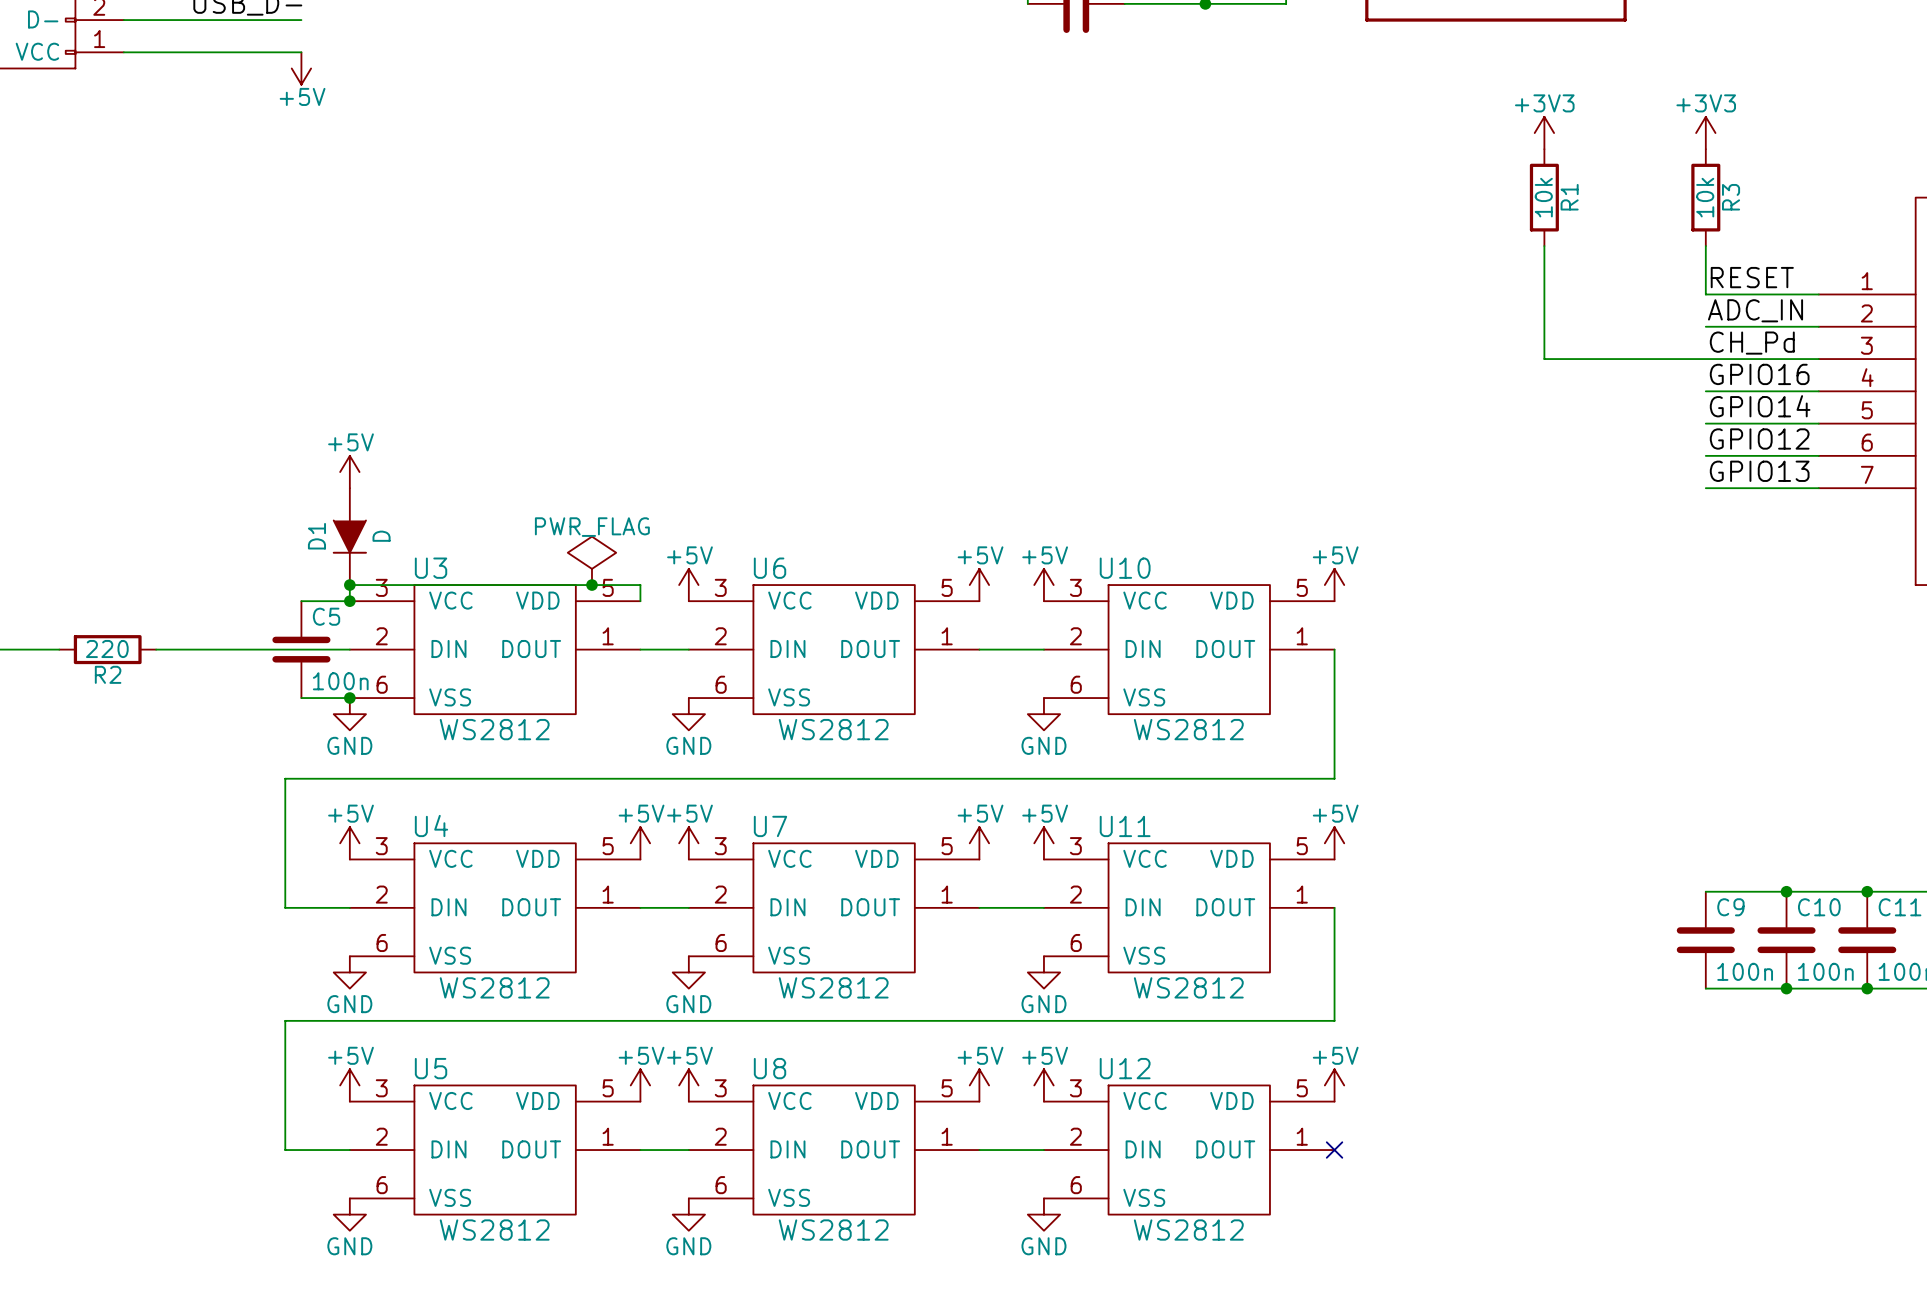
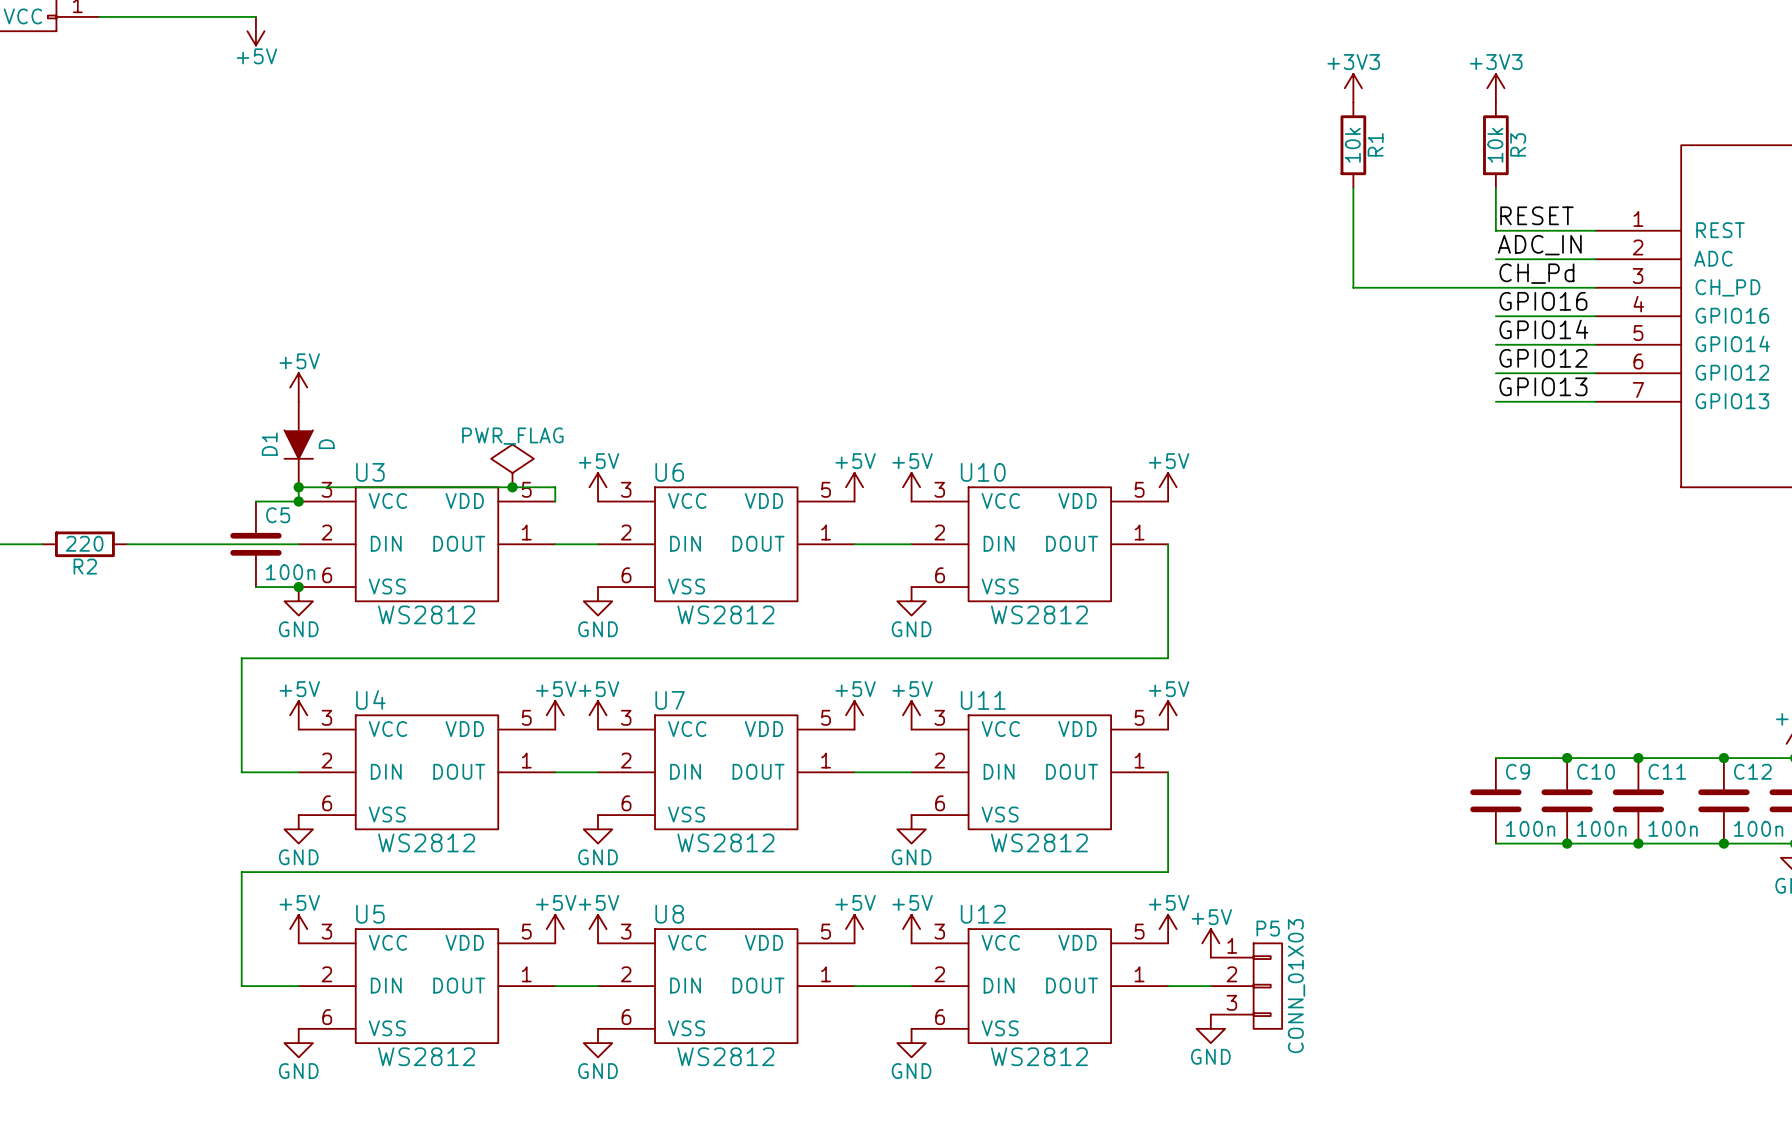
power symbol: none -> +5V (1210, 943)
wire: none -> (1168, 986) (1210, 986)
no-connect mark: (1334, 1150) -> none
P5: none -> CONN_01X03 (1246, 986)
power symbol: none -> GND (1210, 1028)

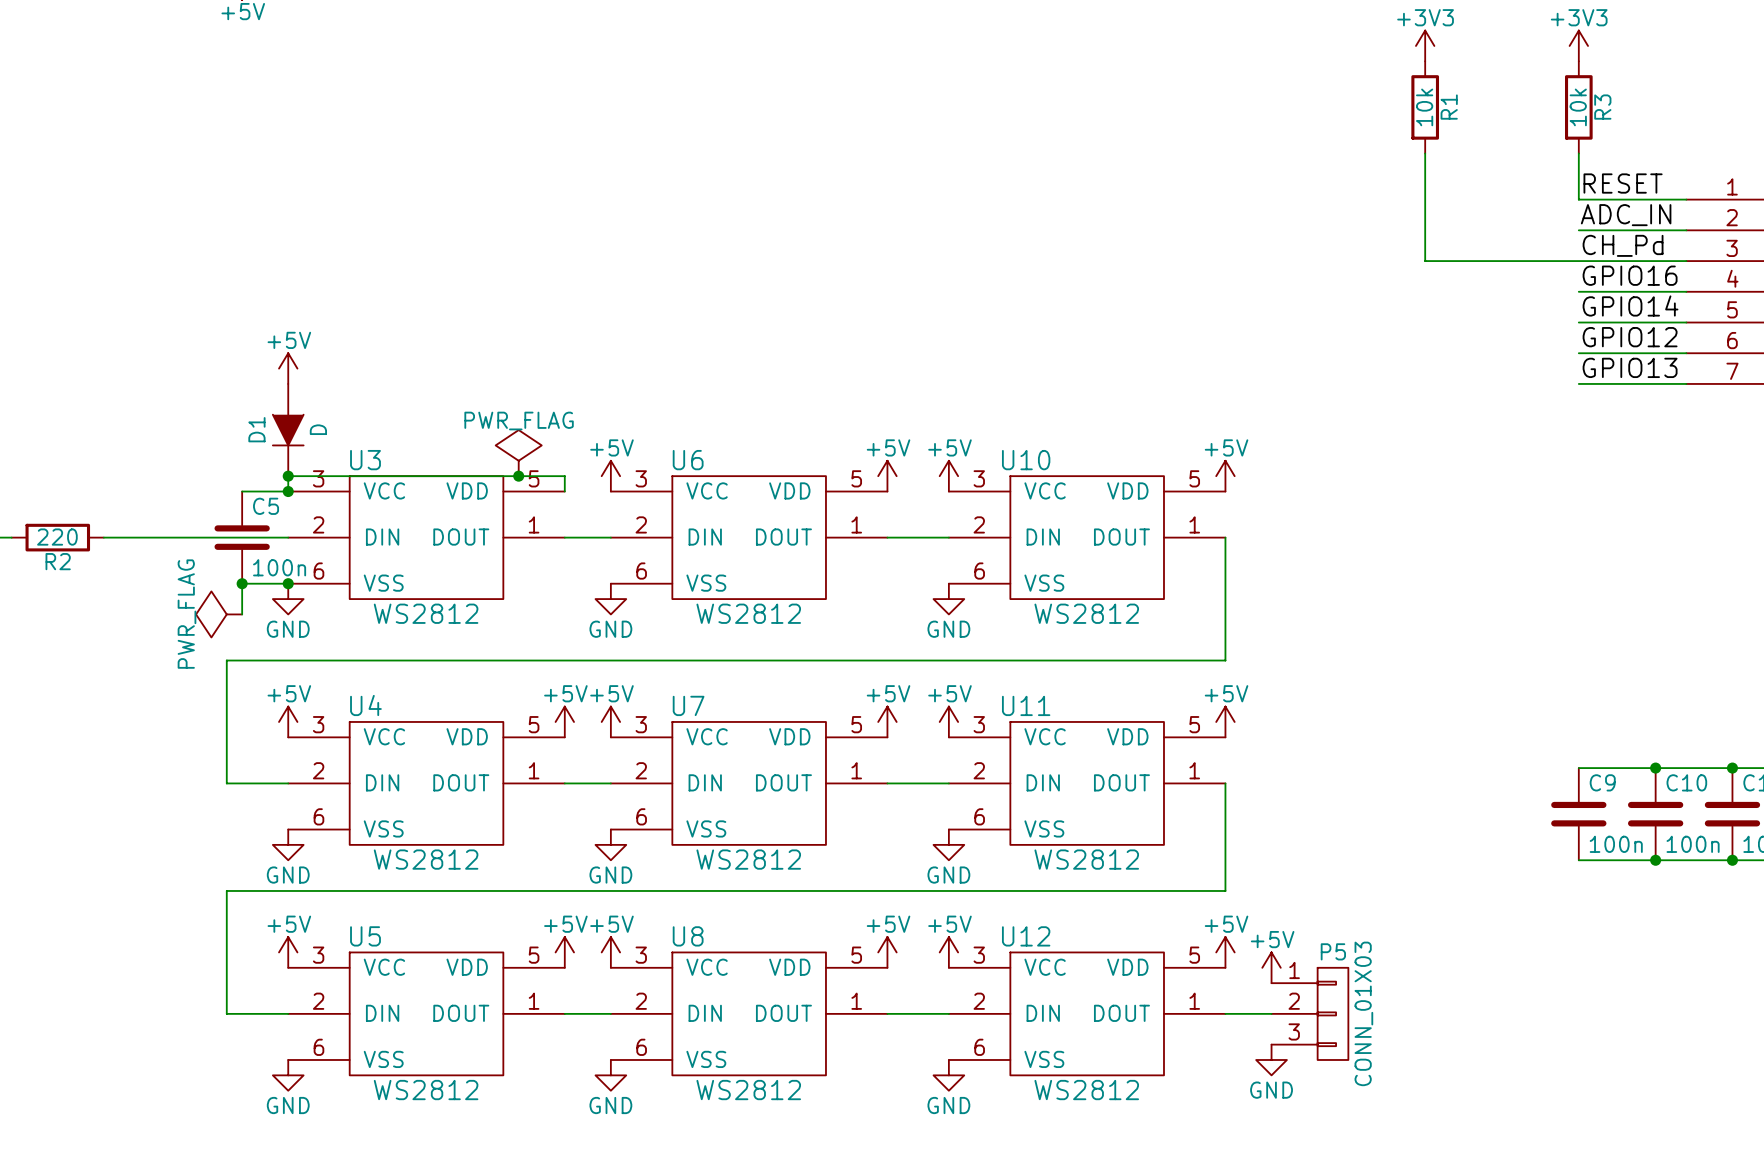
wire: none -> (242, 583) (242, 614)
junction: none -> (242, 583)
power symbol: none -> PWR_FLAG (219, 614)

